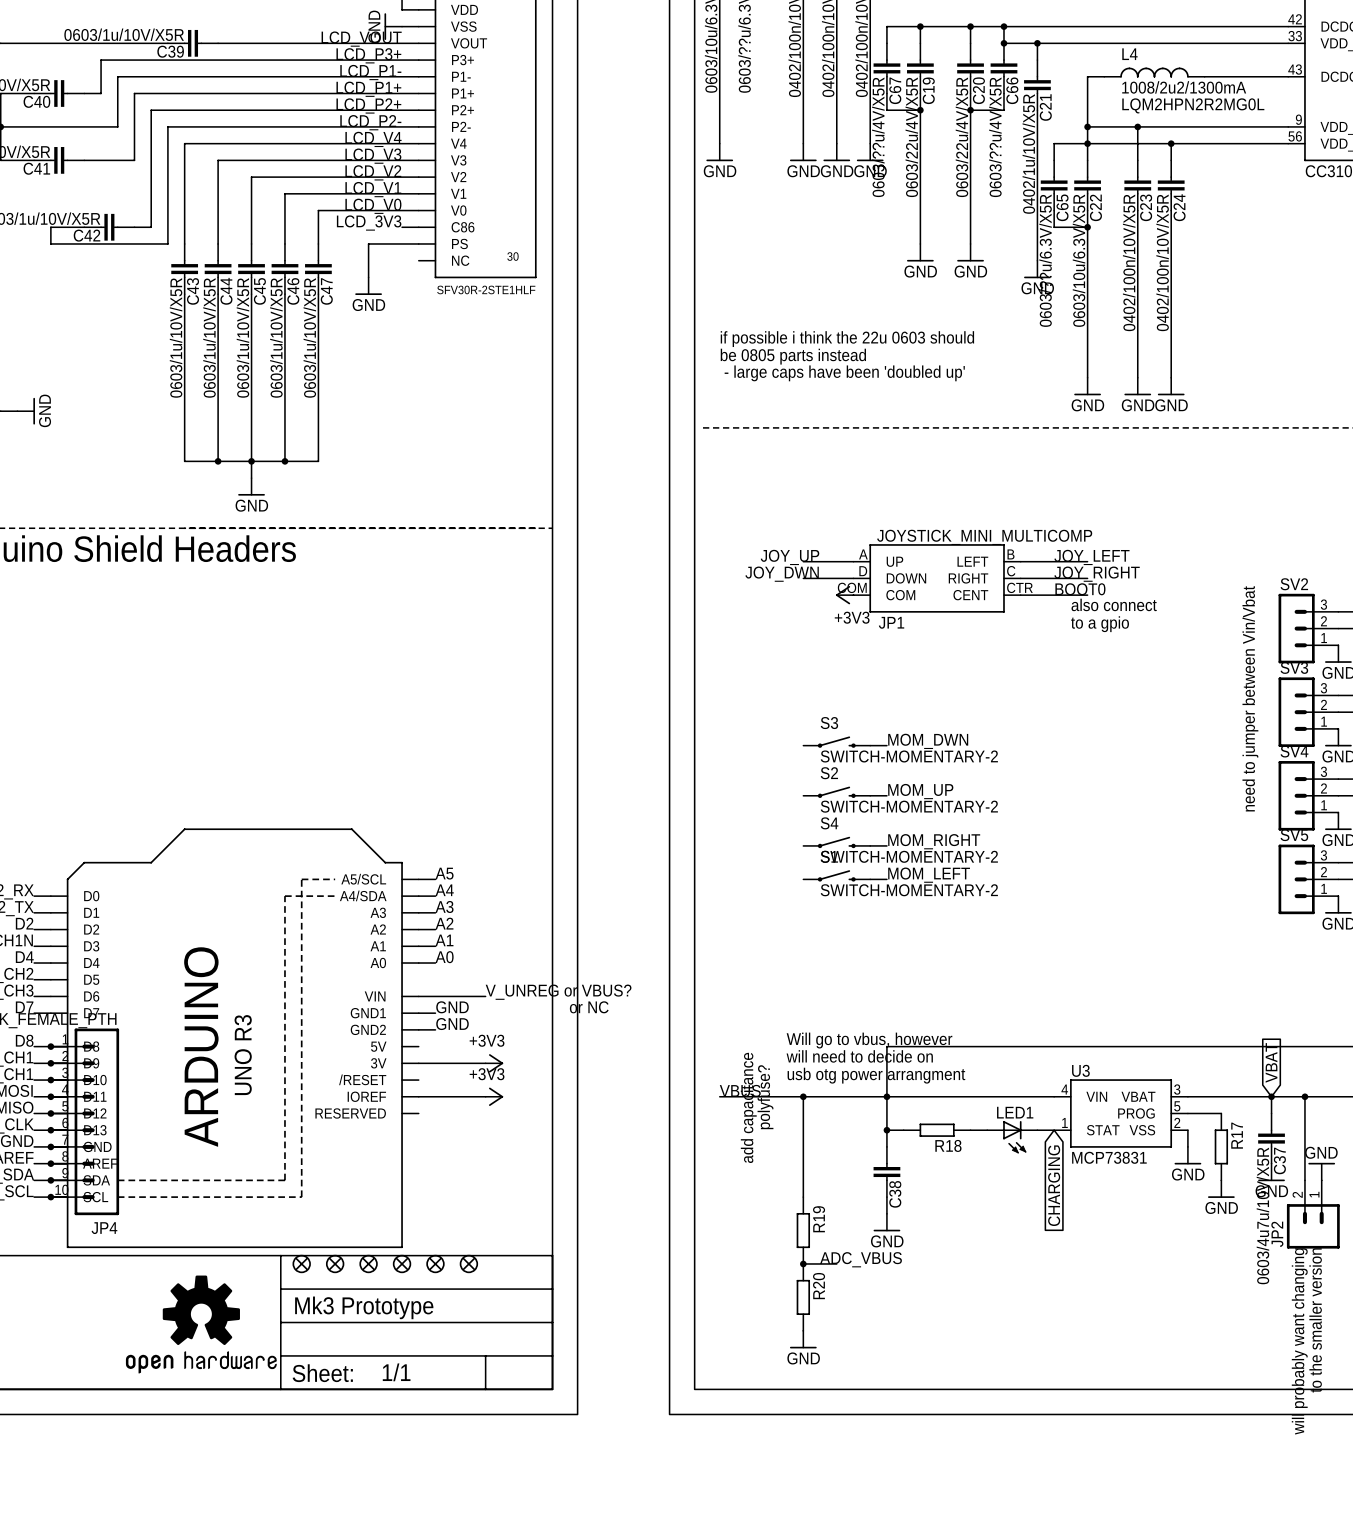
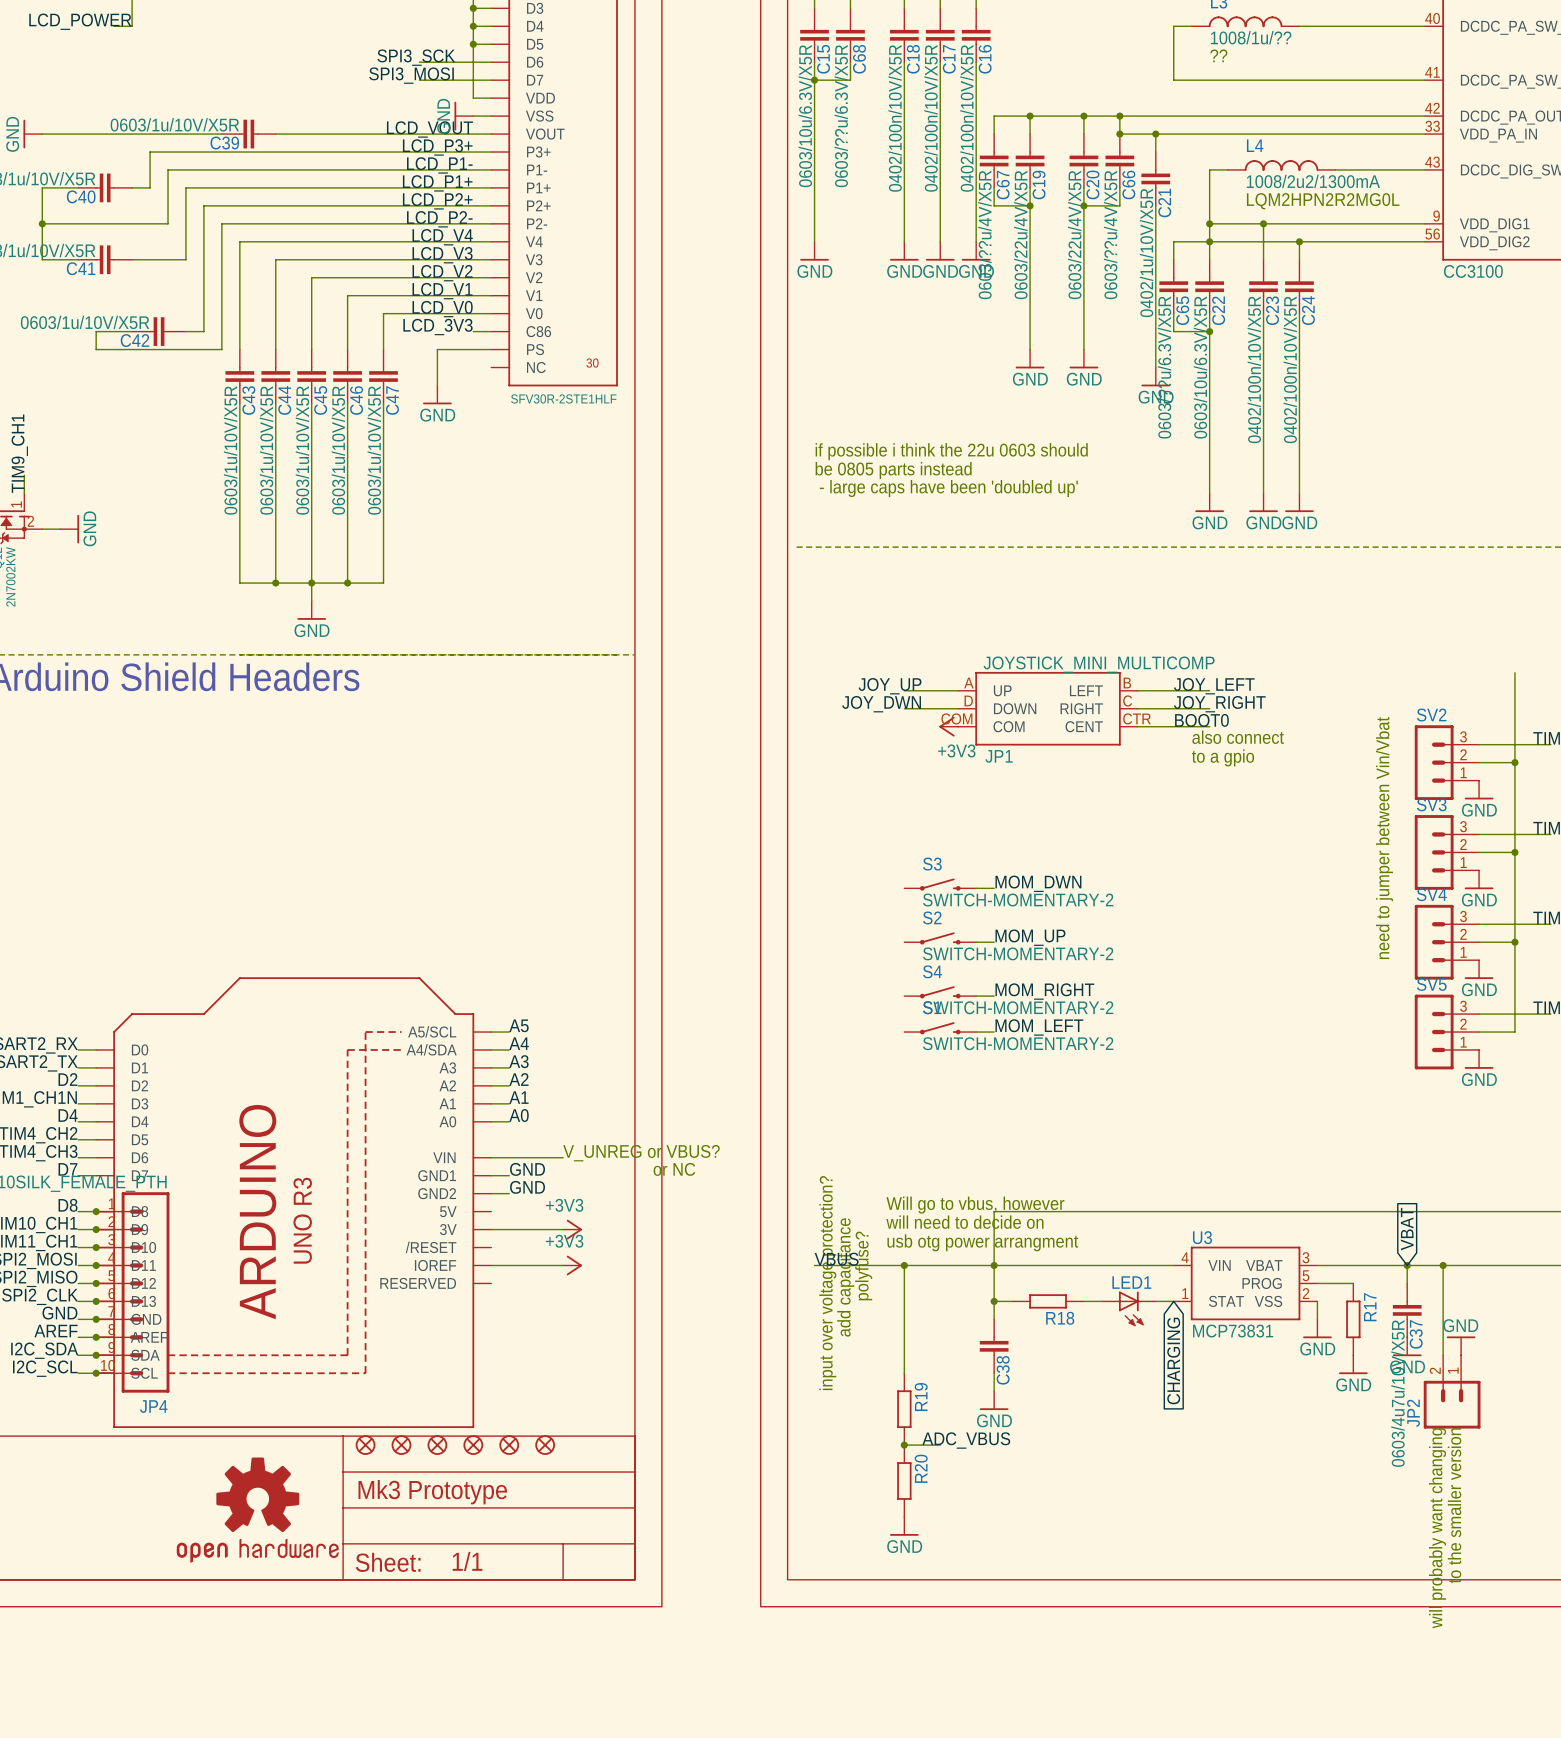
text: none -> input over voltage protection? (827, 1283)

